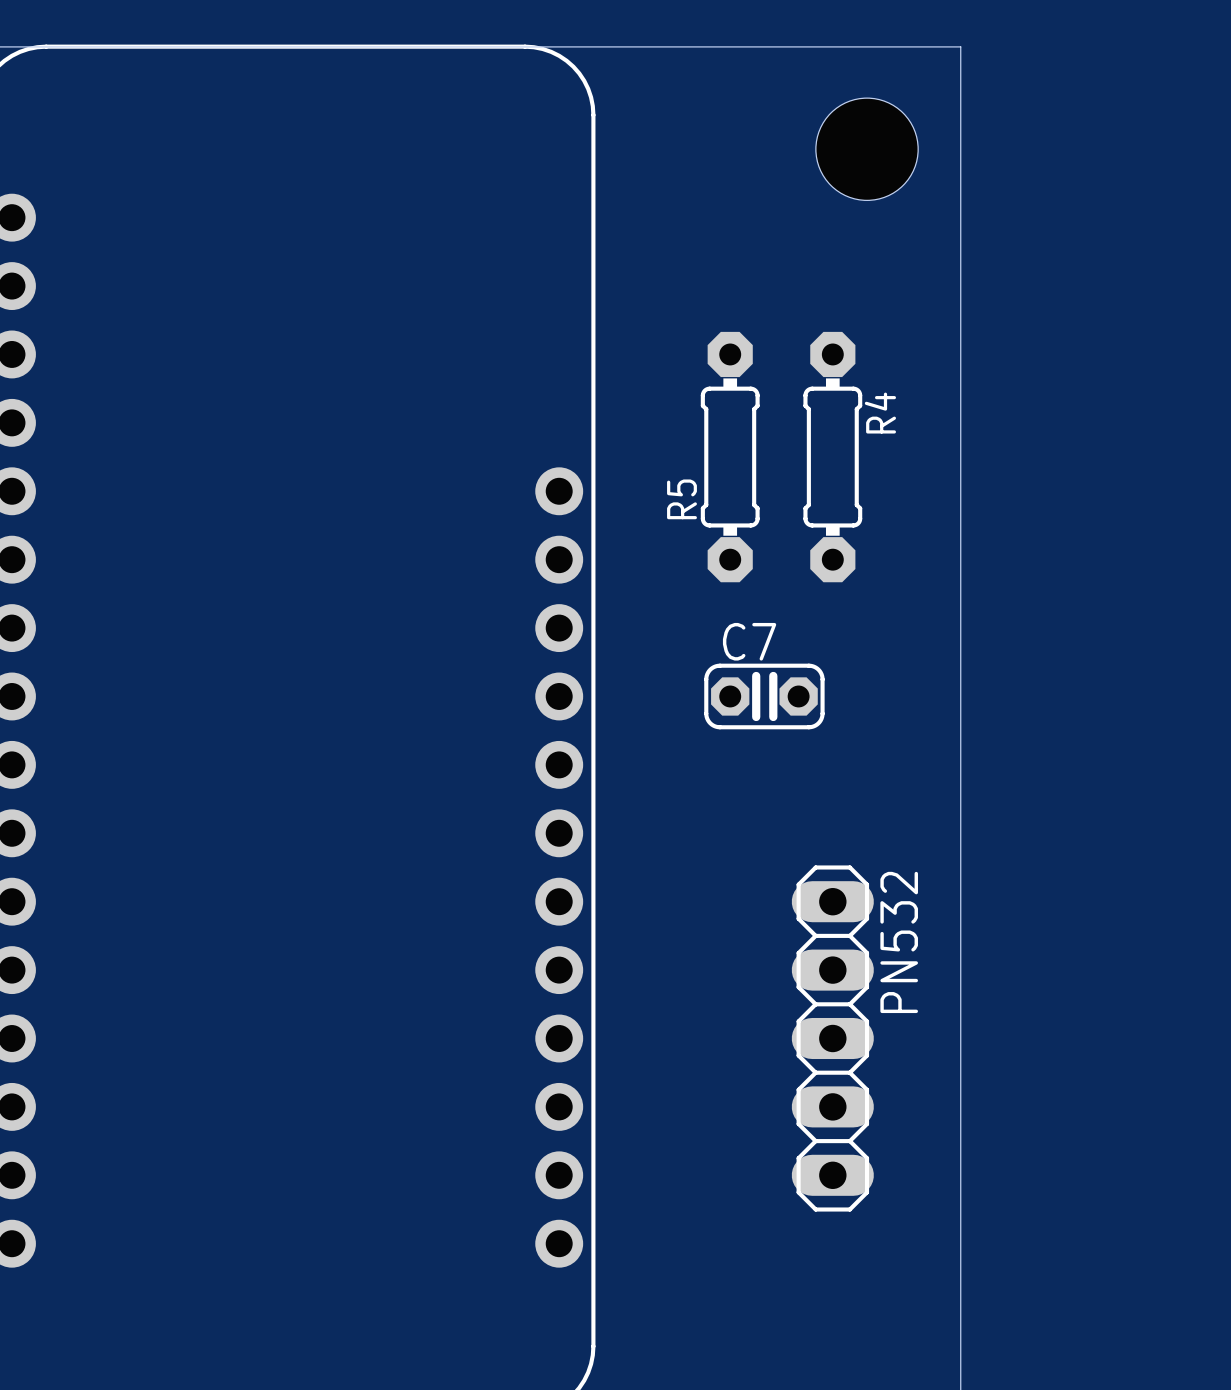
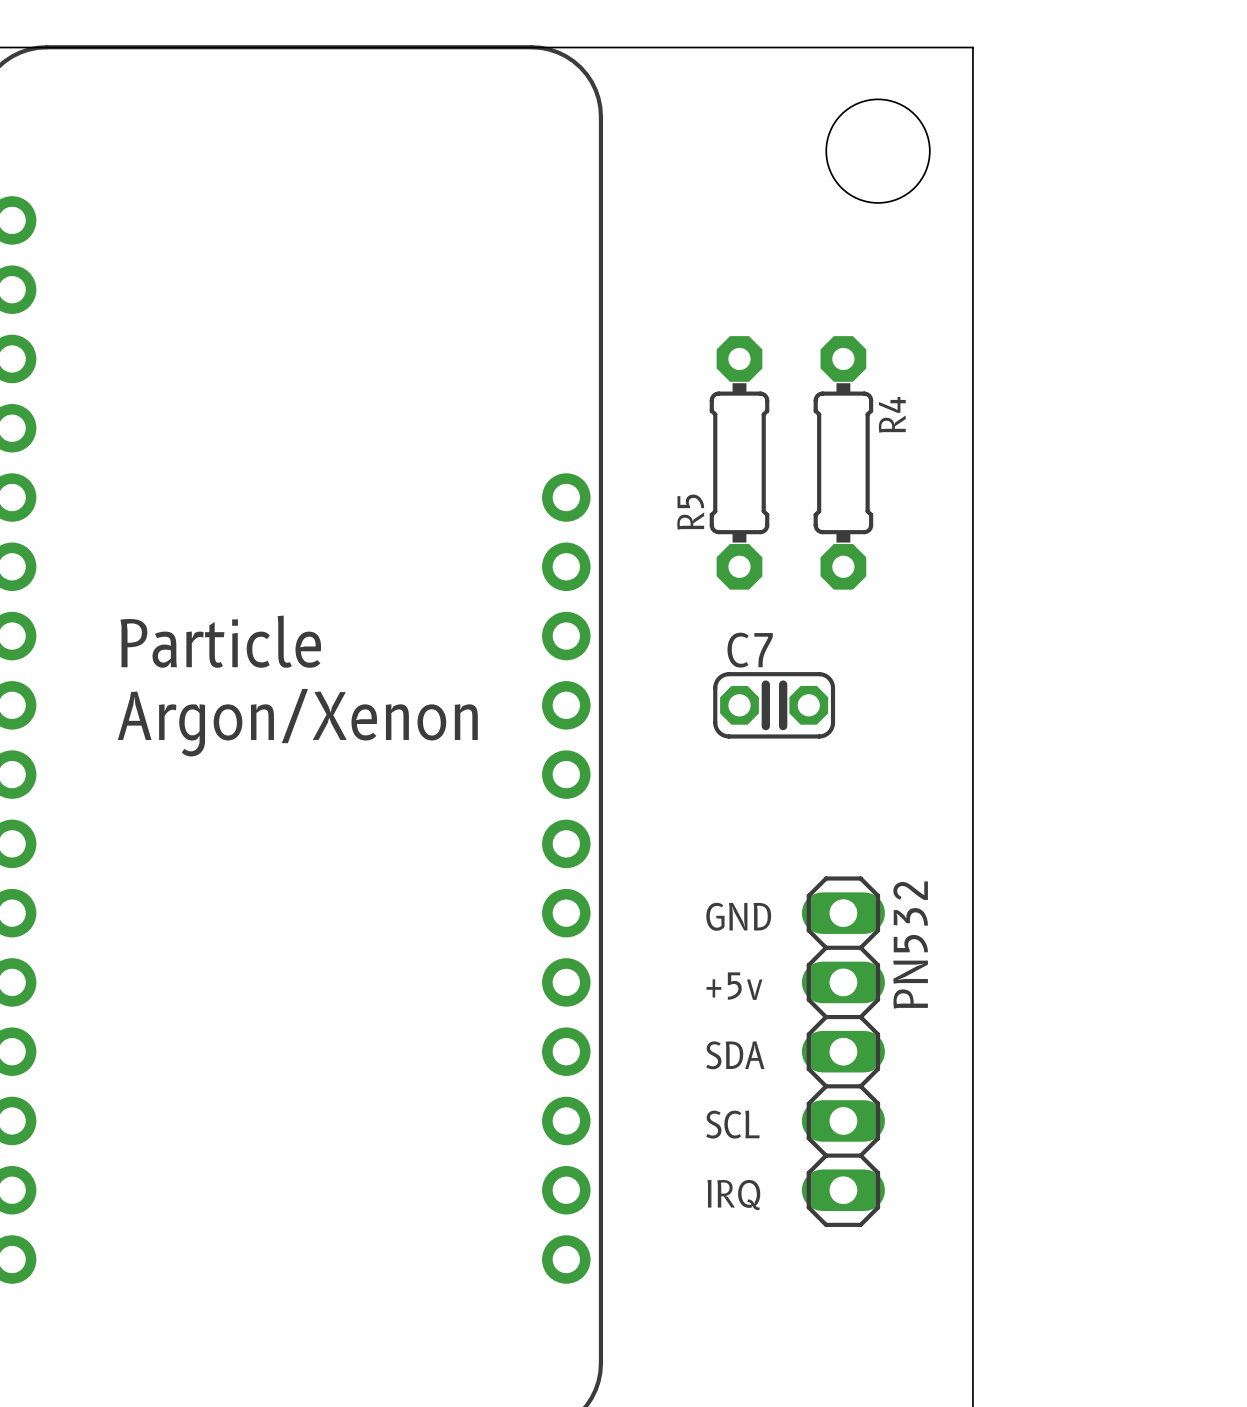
text: none -> Particle (220, 641)
text: none -> Argon/Xenon (297, 722)
text: none -> GND (738, 916)
text: none -> +5v (734, 986)
text: none -> SDA (735, 1055)
text: none -> SCL (732, 1124)
text: none -> IRQ (733, 1195)

